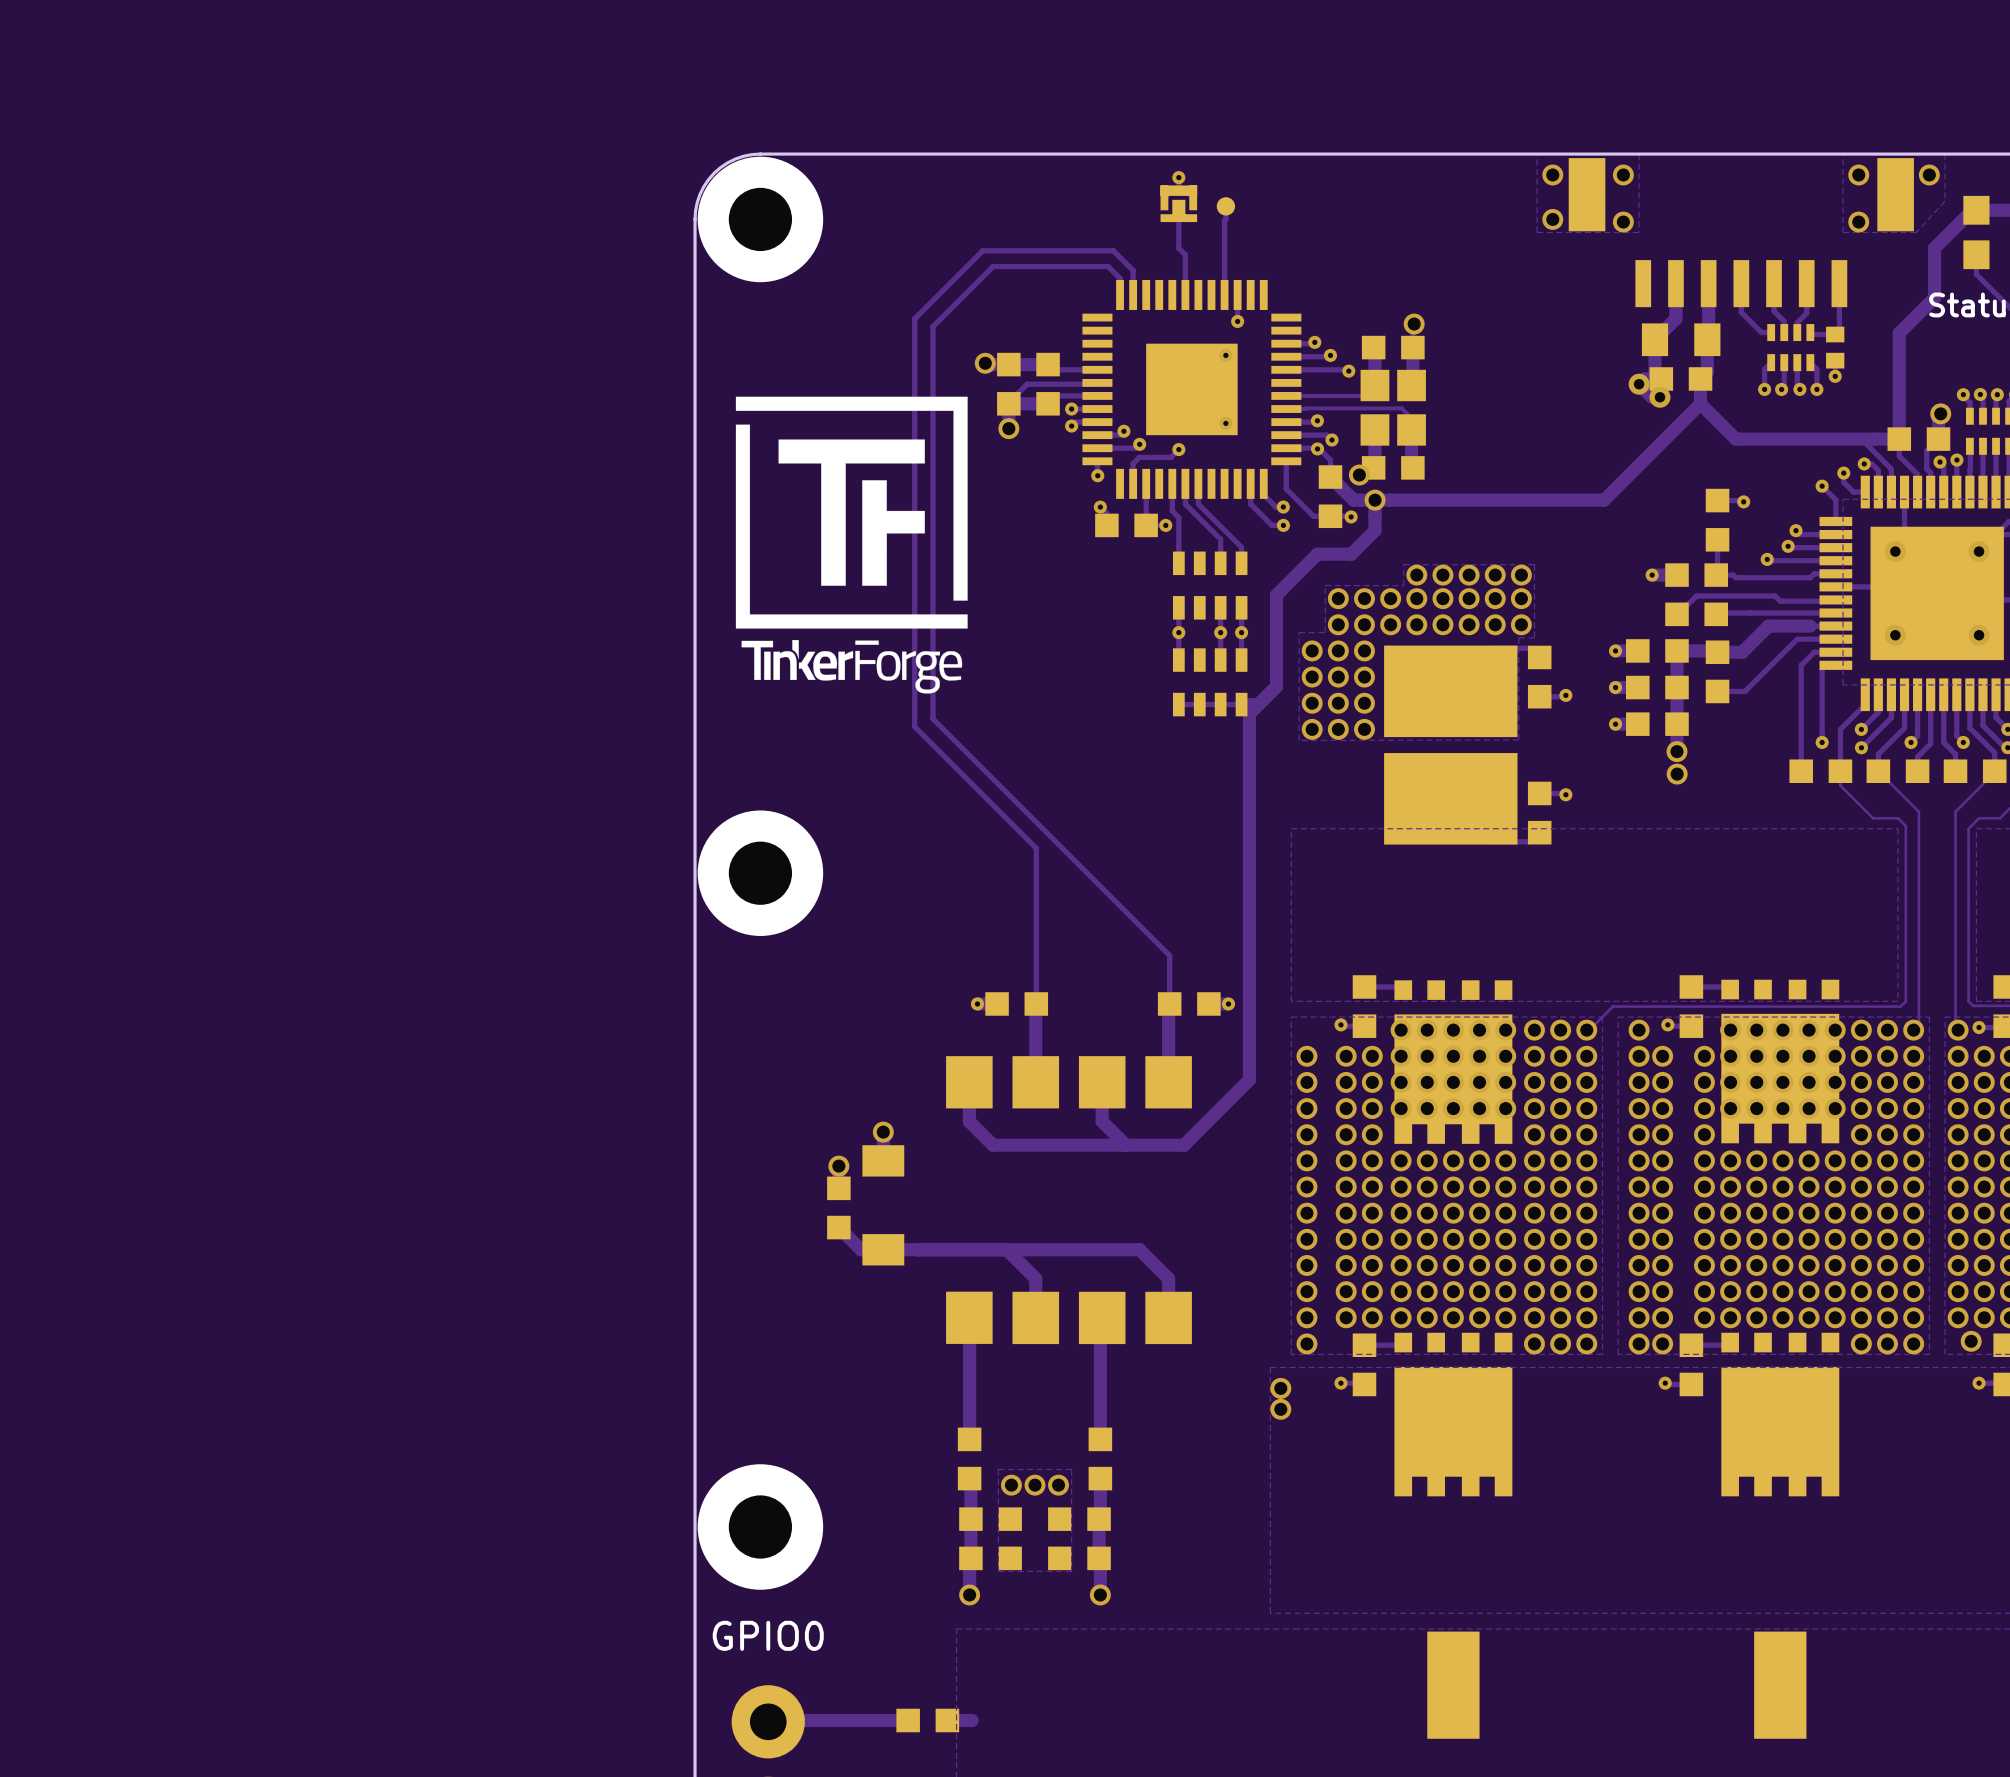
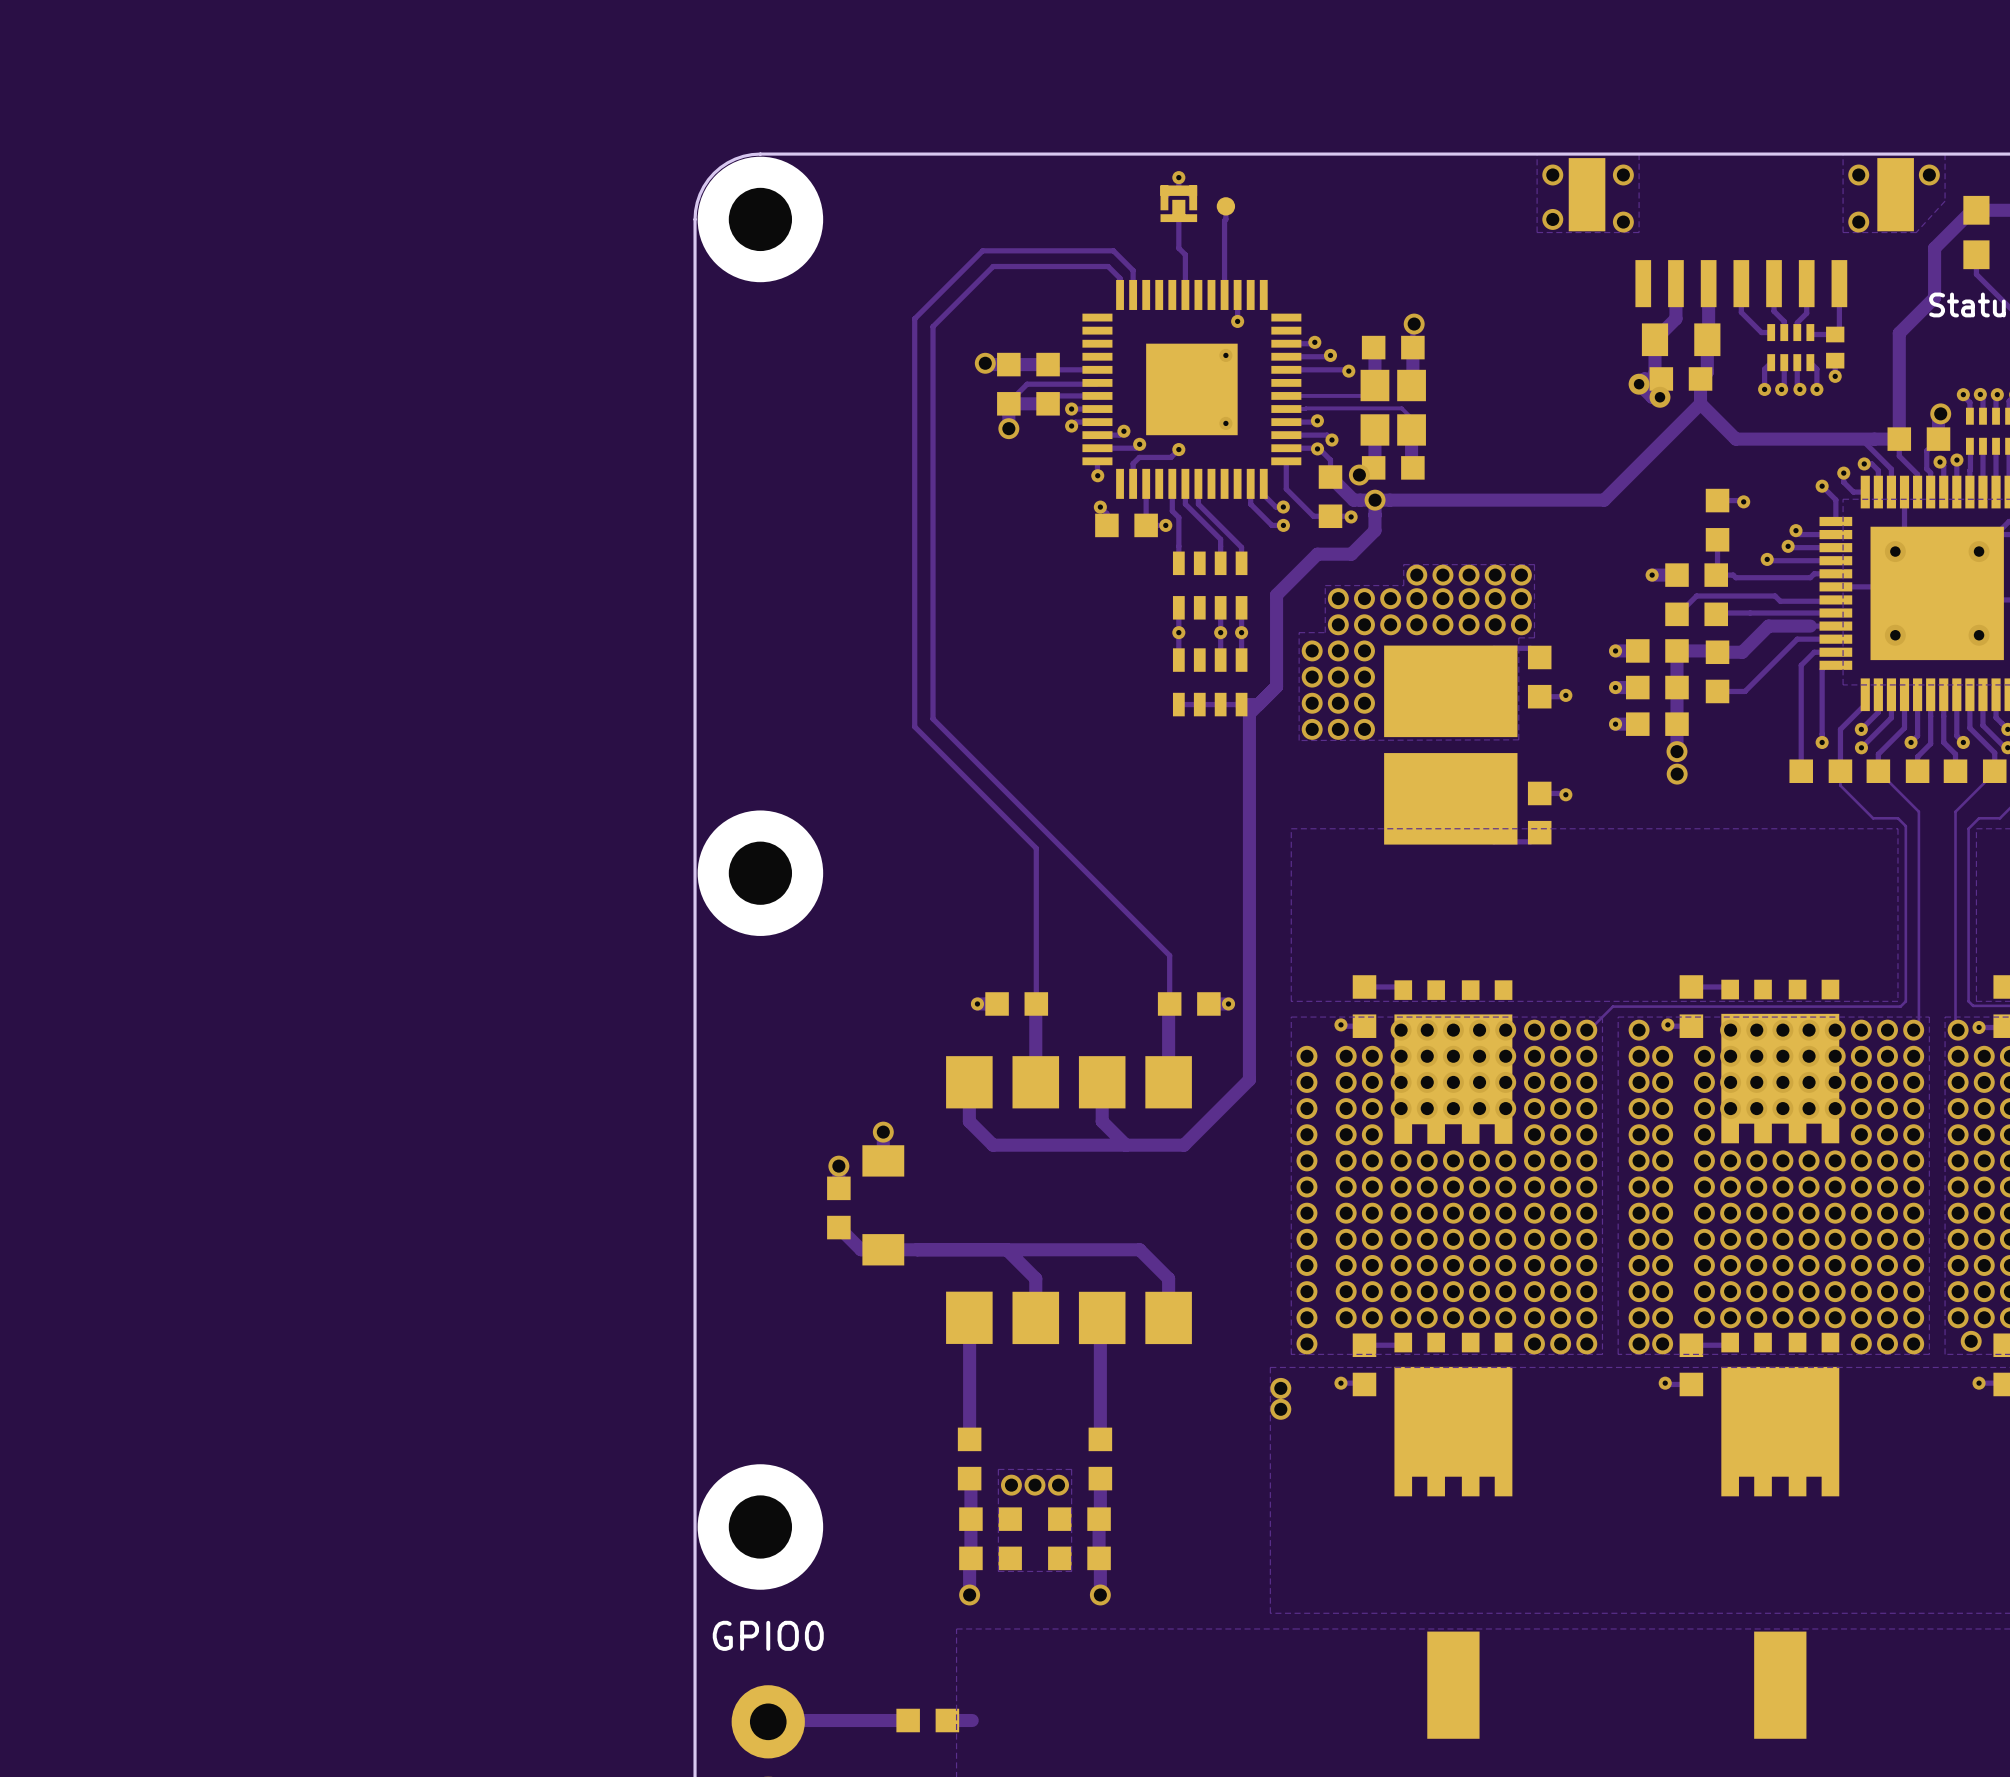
drawing: [735, 396, 968, 694] -> none

